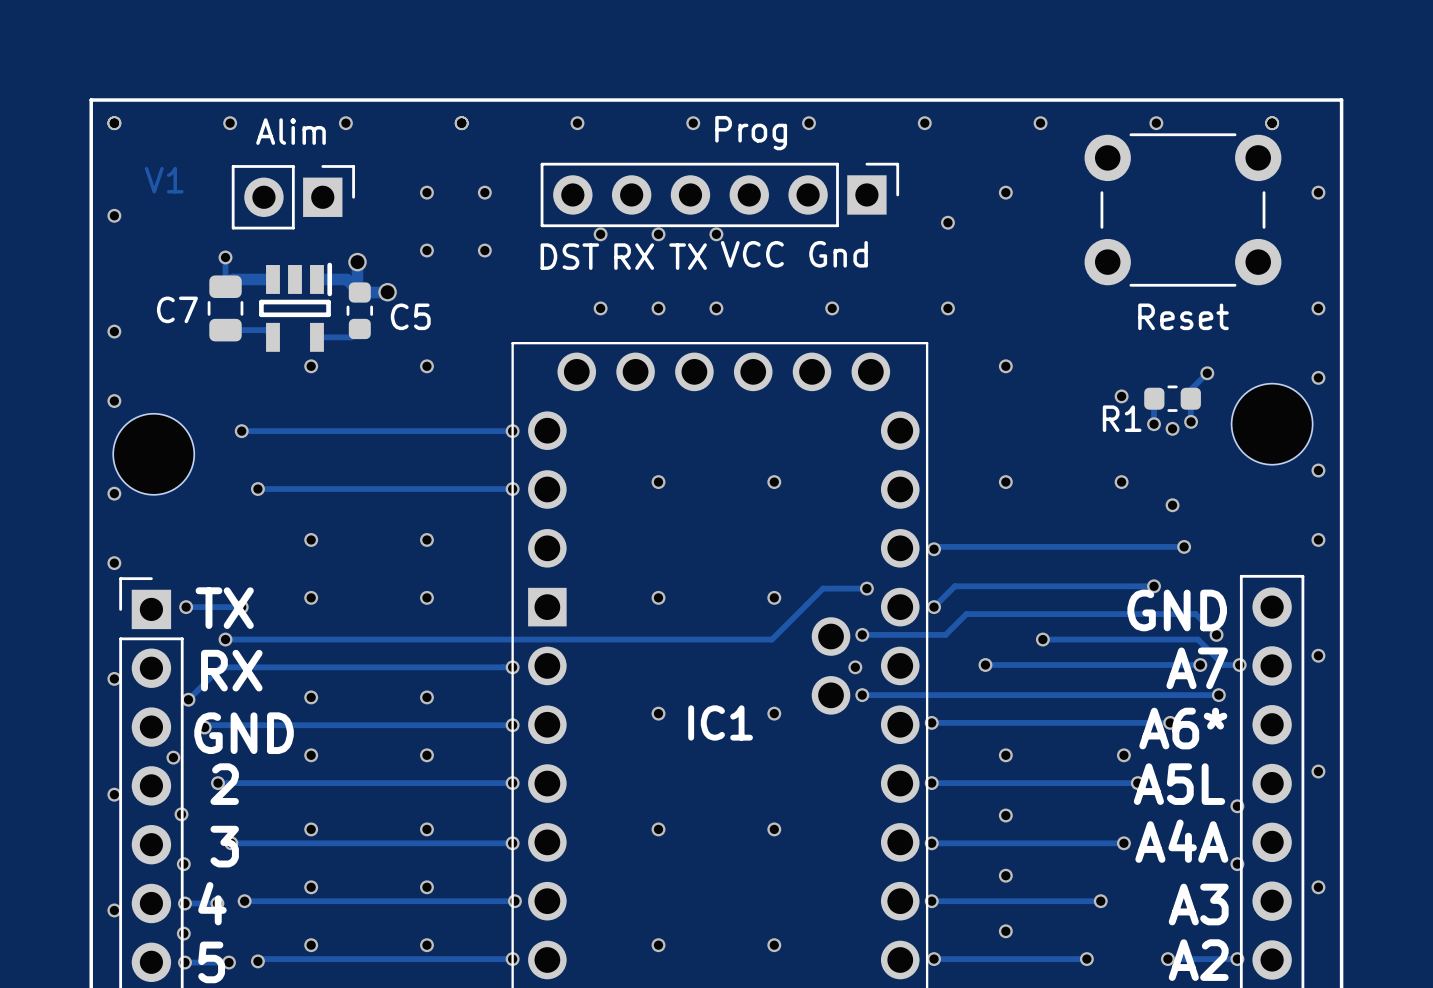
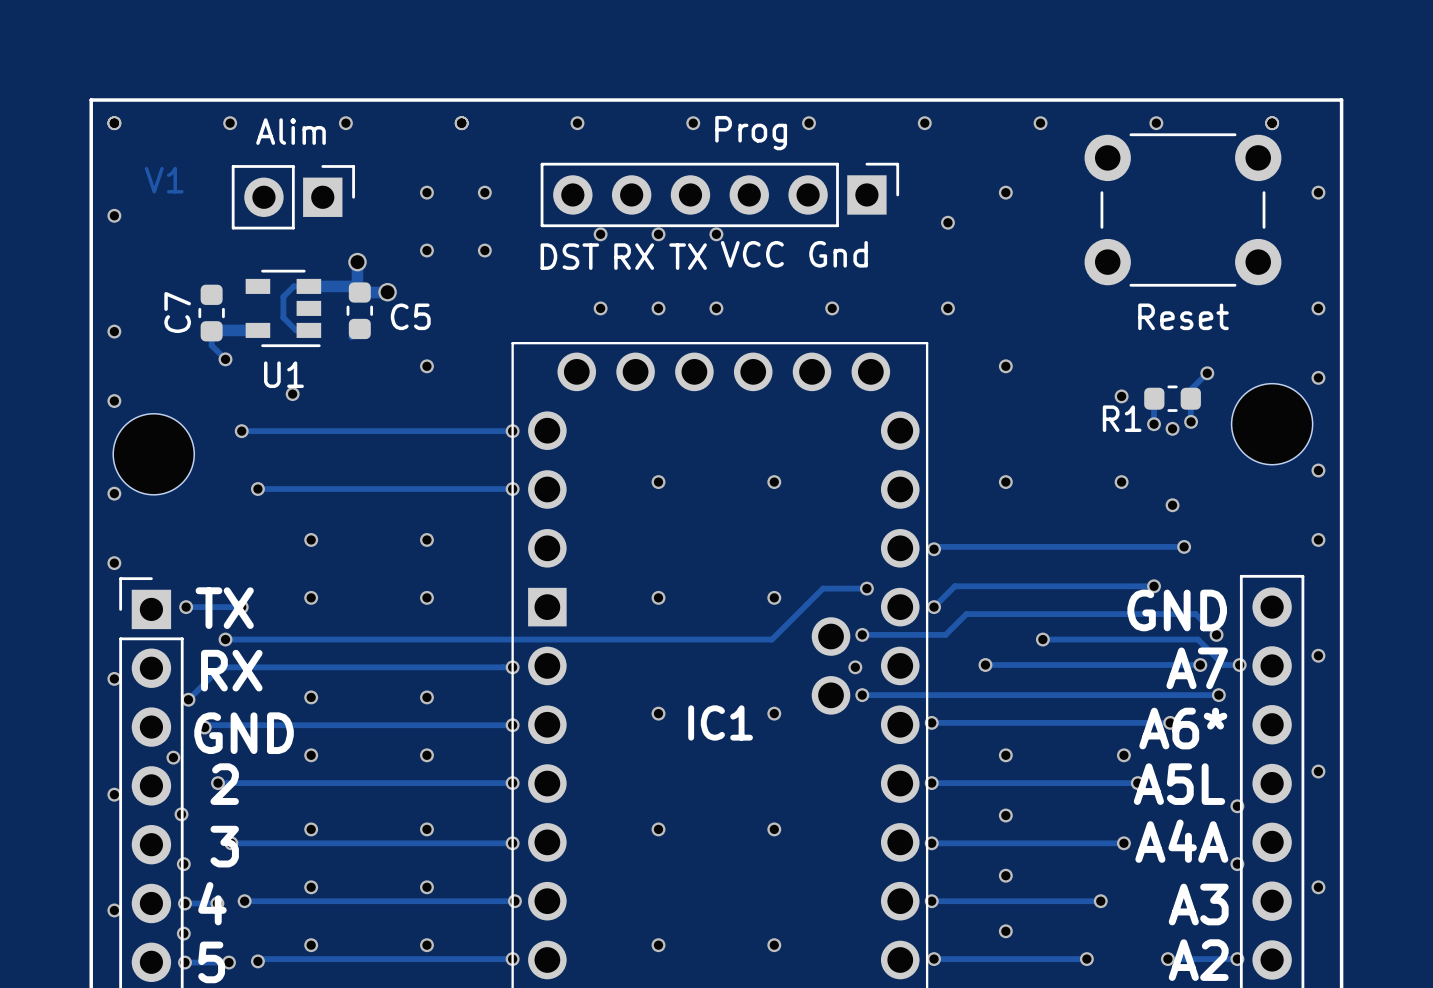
track: (225, 257) (225, 286) (232, 279) (272, 279) -> none
via: (225, 257) -> none
C7 footprint: [207, 275, 244, 342] -> [198, 284, 225, 342]
track: (316, 279) (346, 279) (353, 286) -> (316, 330) (296, 330) (283, 317) (283, 296) (293, 286) (353, 286)
part: (295, 307) -> none
U1: none -> (283, 308)
C7 name rotation: 0° (177, 309) -> 90° counterclockwise (177, 312)
track: (225, 330) (265, 330) (272, 337) -> none
track: none -> (255, 330) (212, 330) (211, 345) (225, 359)
track: (316, 337) (351, 337) -> none
via: none -> (225, 359)
via position: (311, 366) -> (292, 394)

